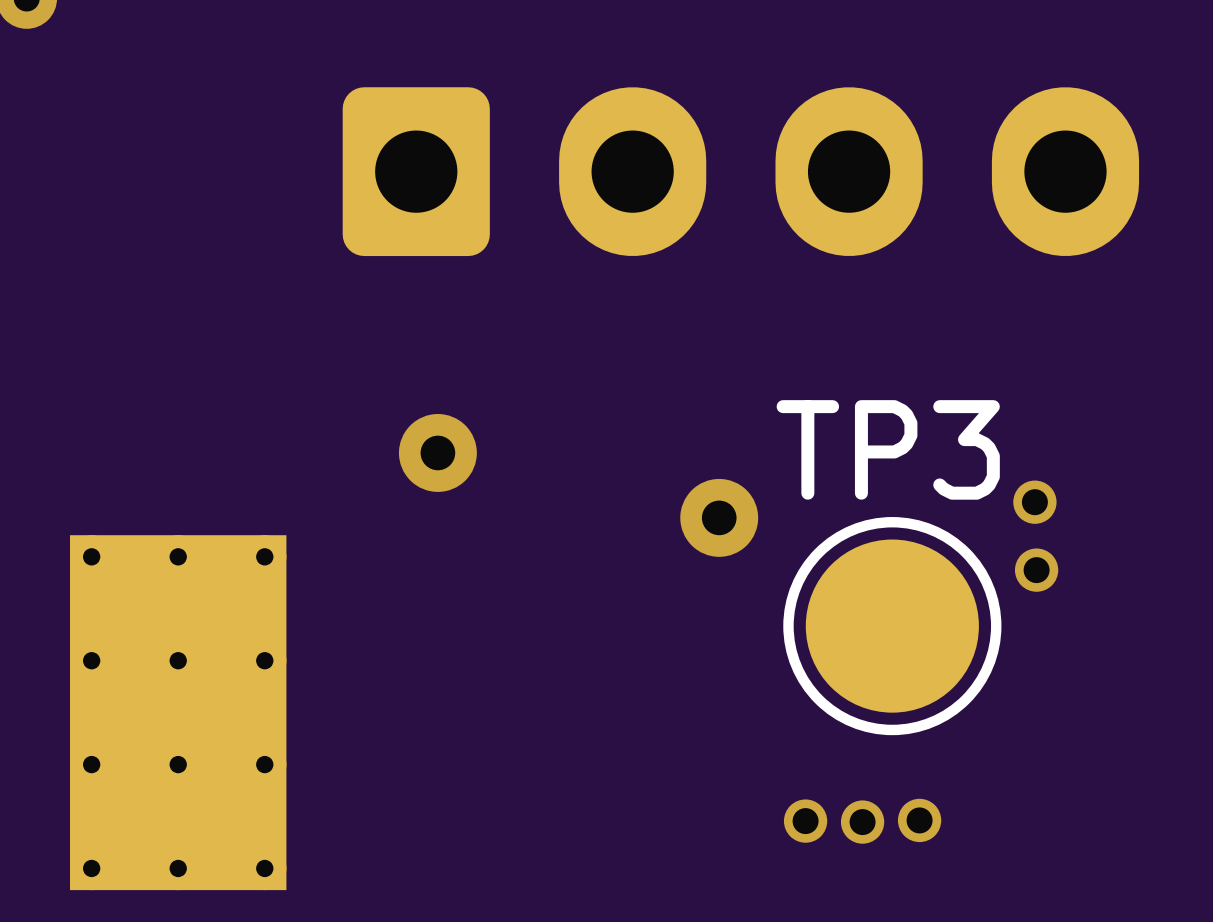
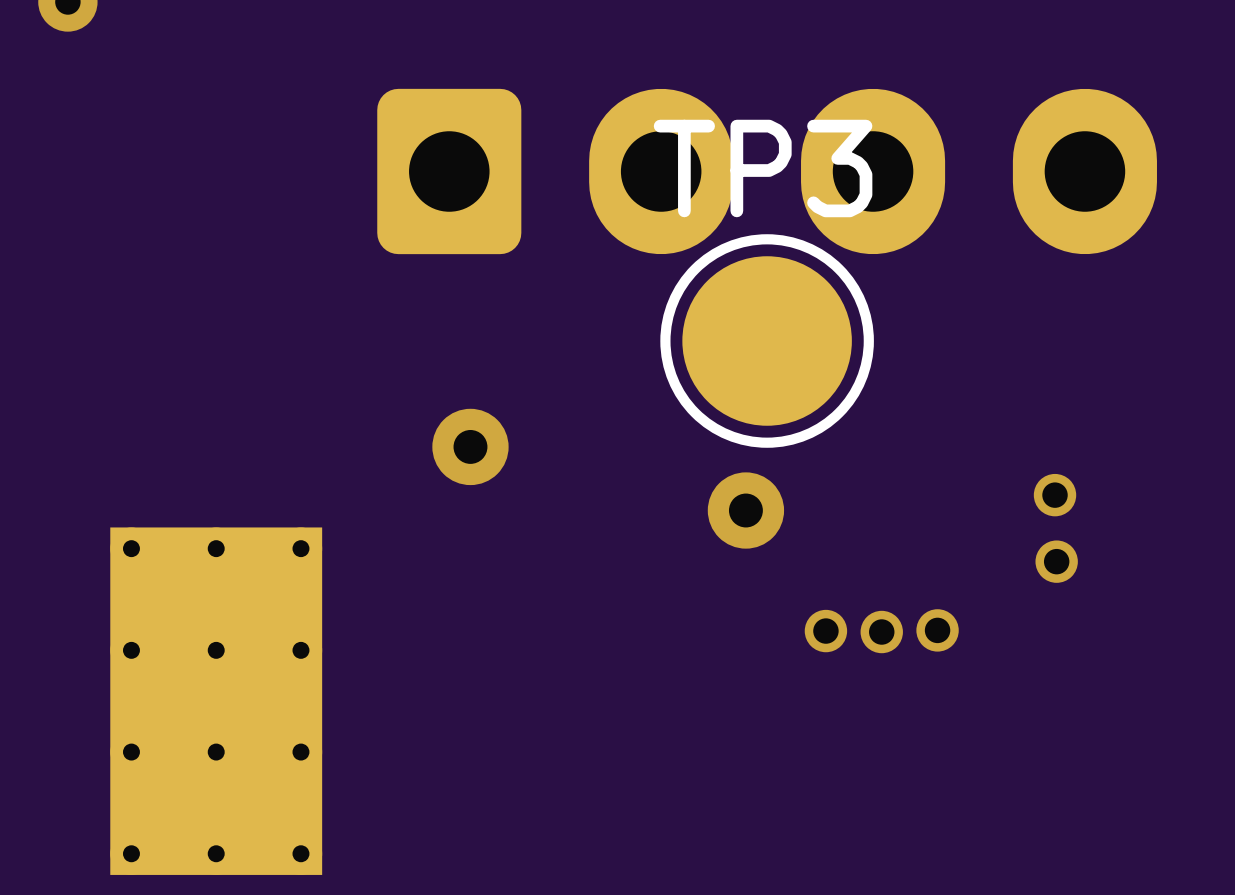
TP3 position: (892, 626) -> (767, 341)
via: none -> (937, 630)
via: none -> (825, 631)
via: none -> (881, 632)
via: (919, 820) -> none
via: (805, 821) -> none
via: (862, 822) -> none

